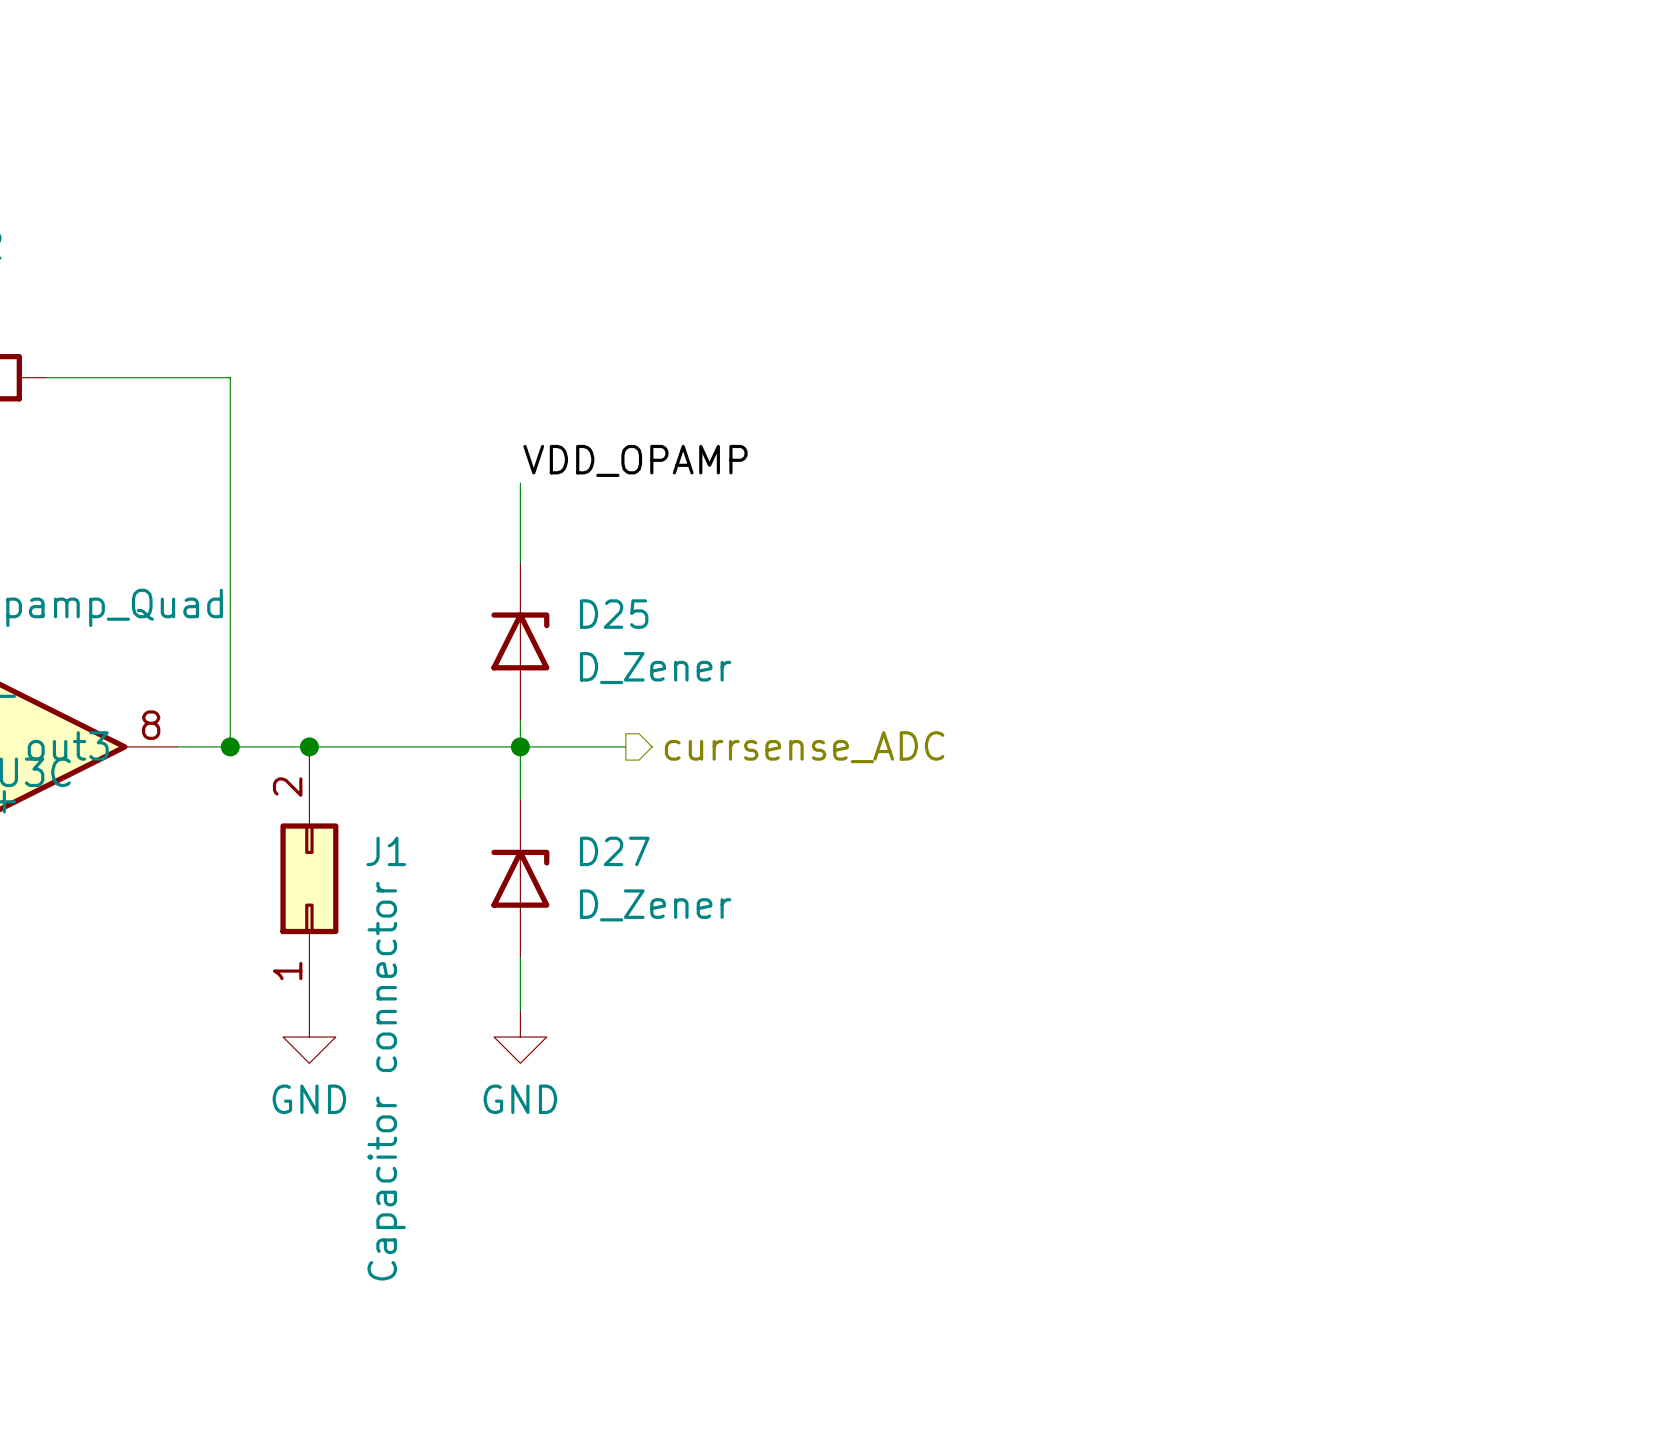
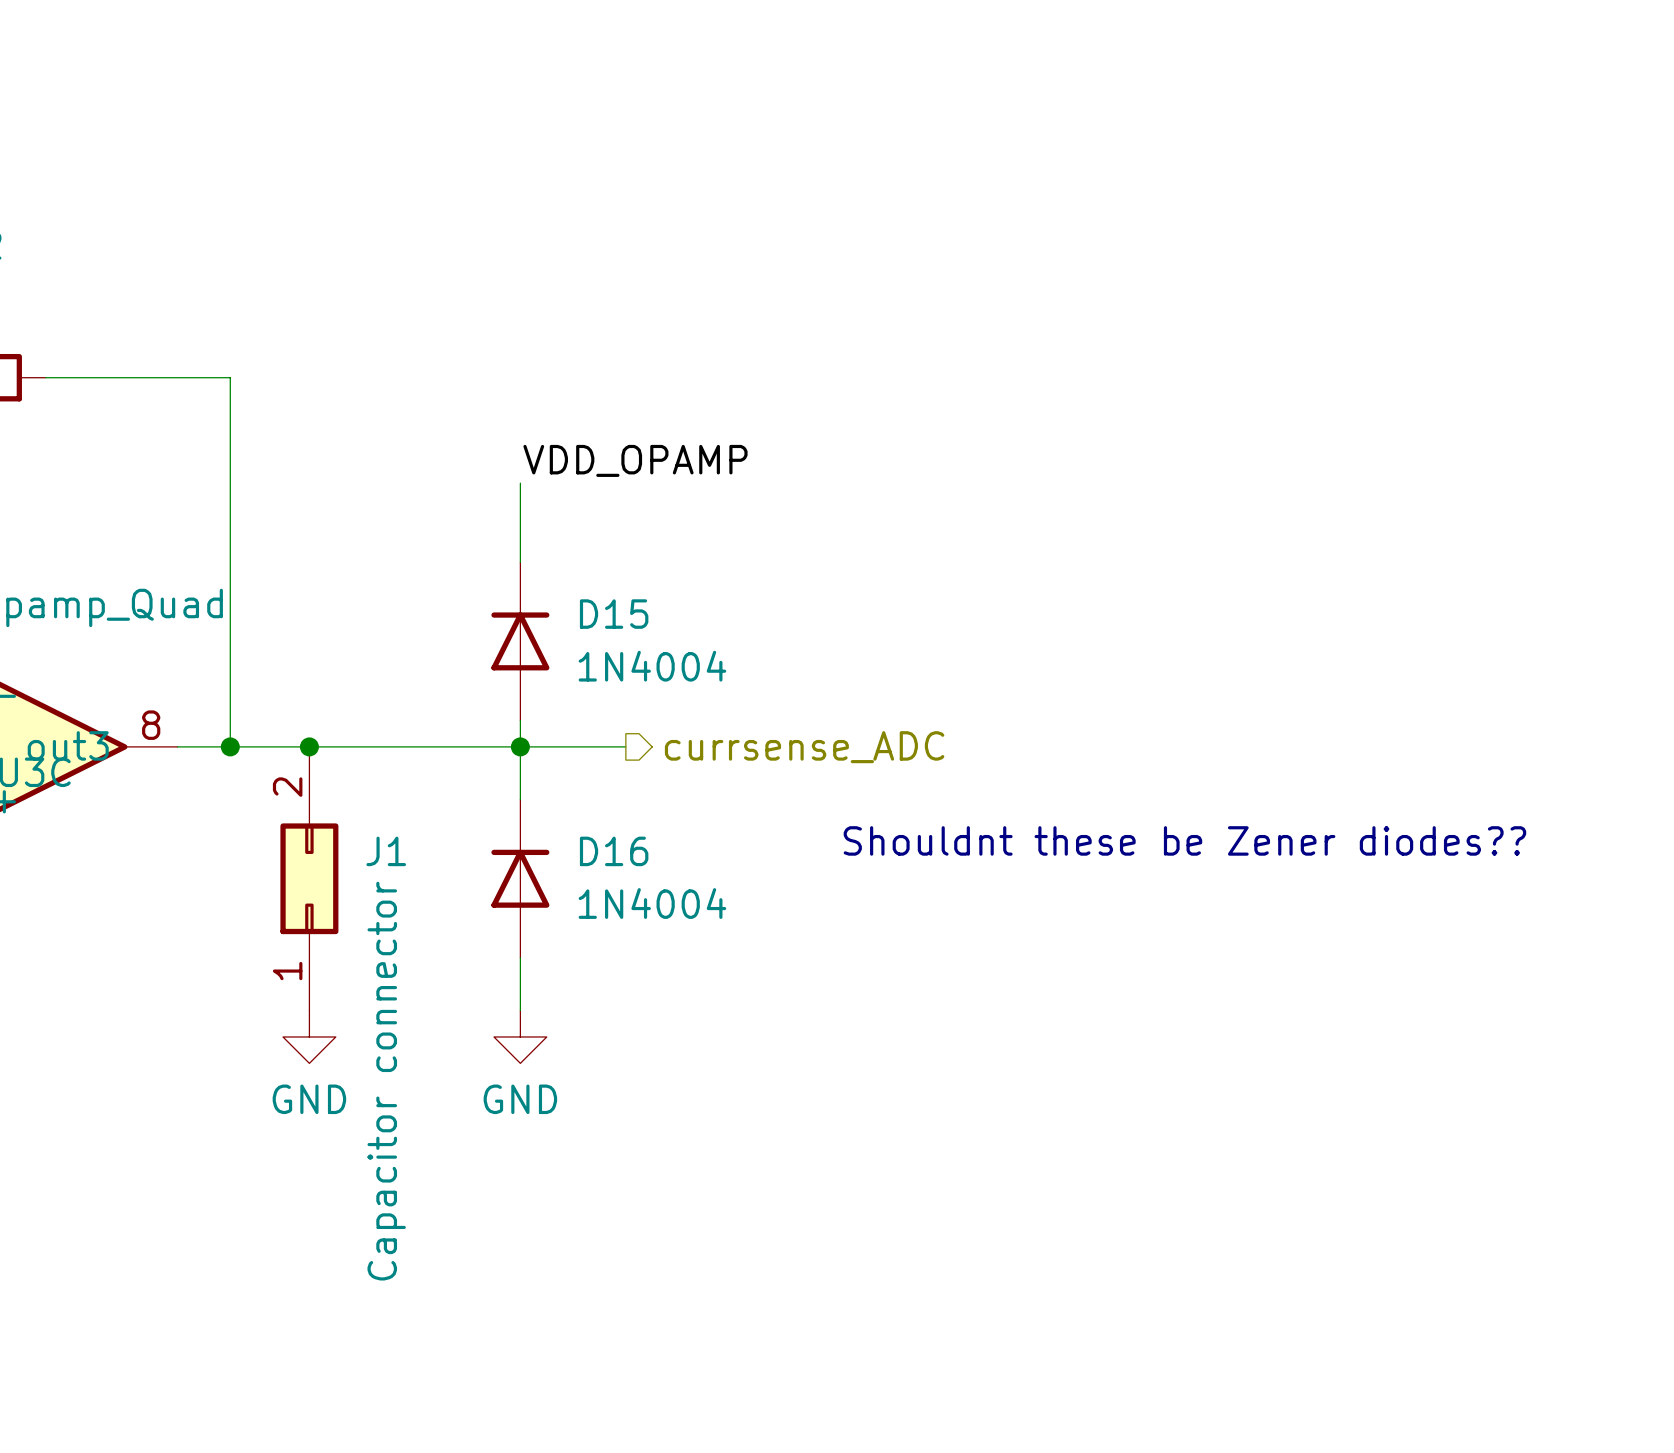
D25: D_Zener (520, 641) -> none
D15: none -> 1N4004 (520, 641)
text: none -> Shouldnt these be Zener diodes?? (1184, 840)
D27: D_Zener (520, 878) -> none
D16: none -> 1N4004 (520, 878)

